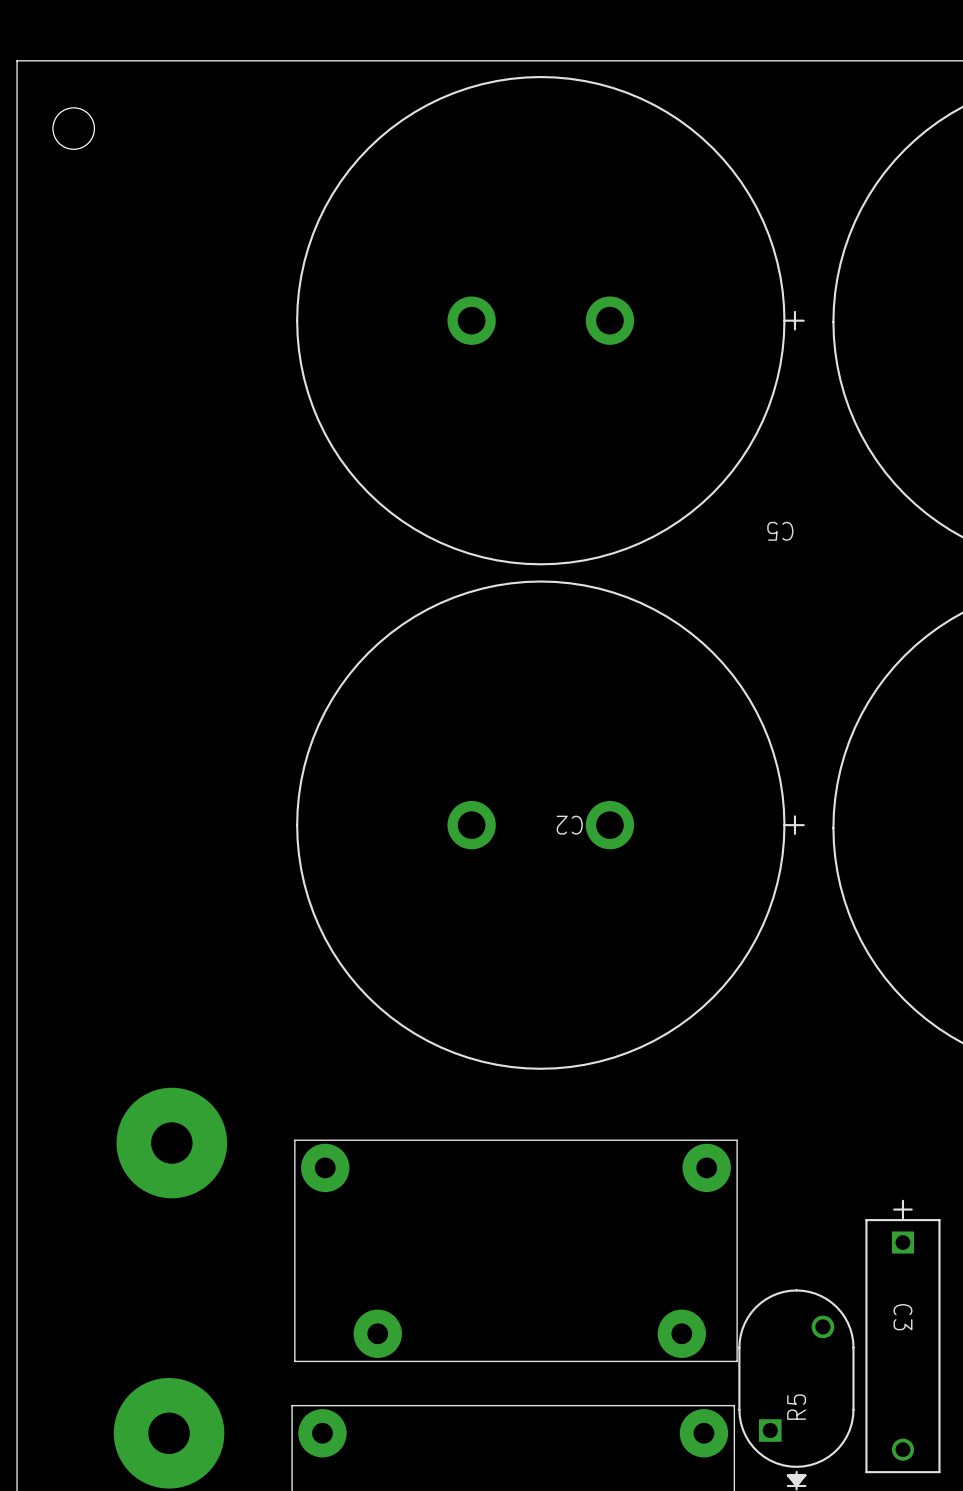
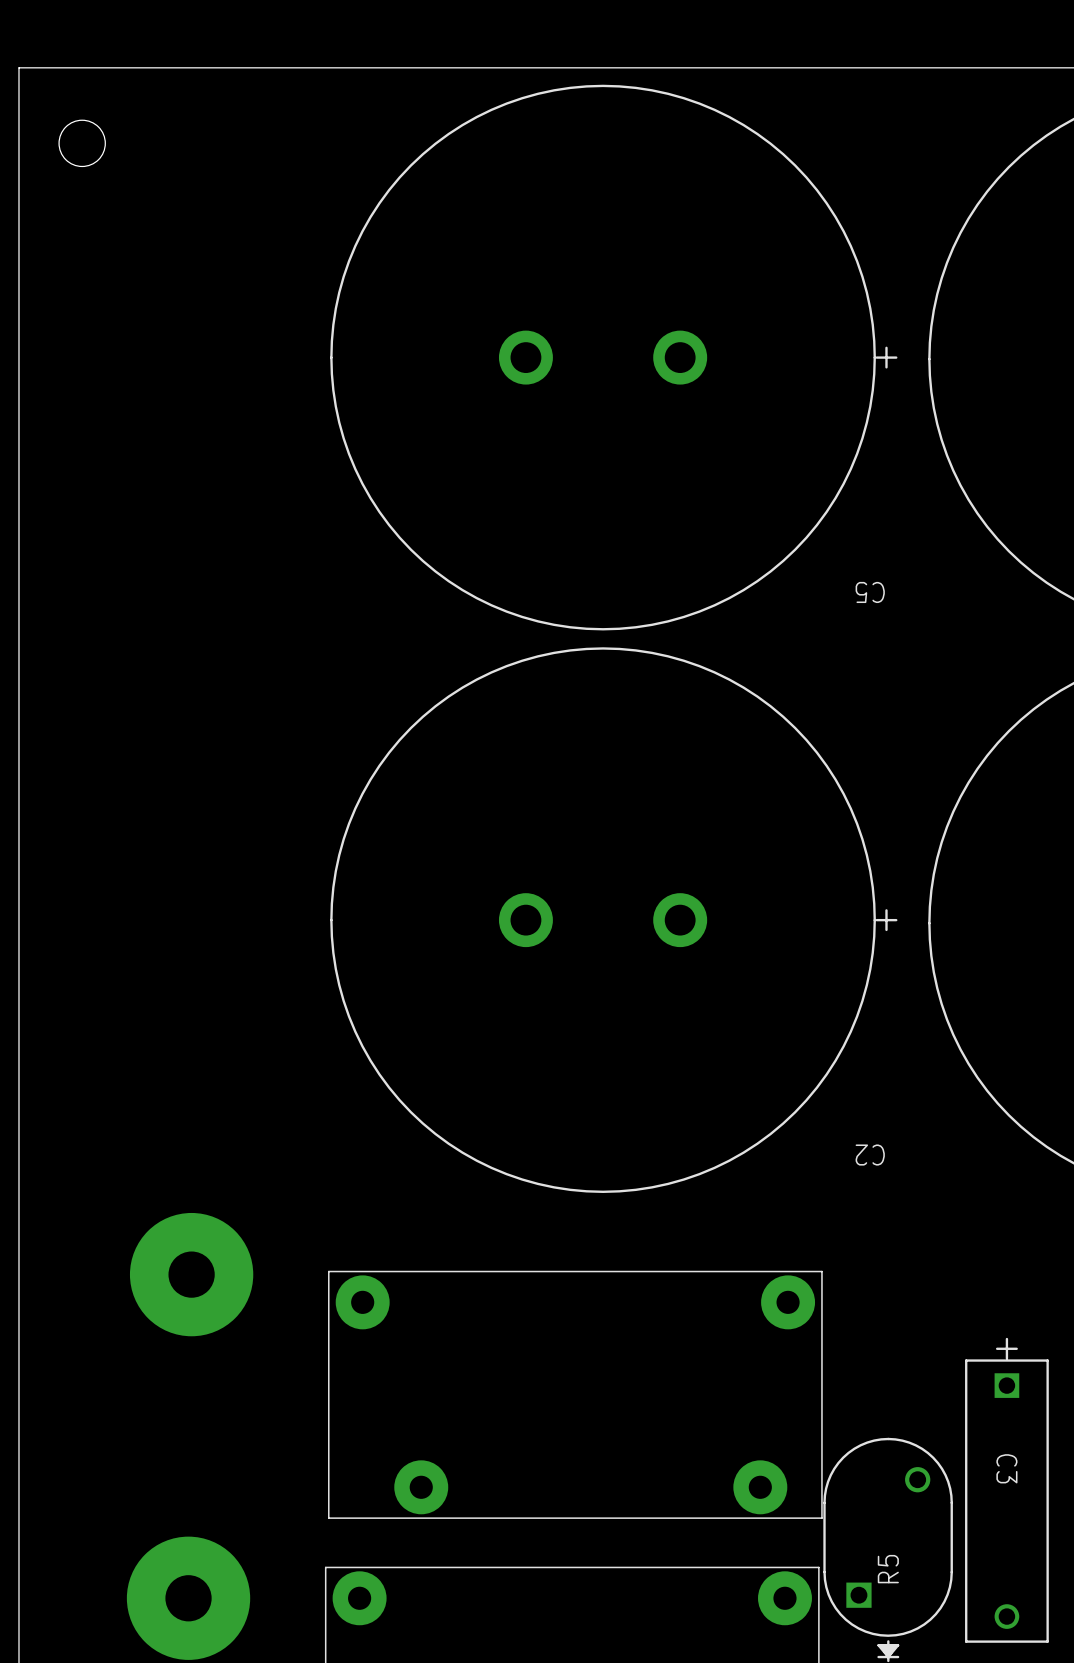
C2 name position: C2 (569, 825) -> C2 (870, 1155)

